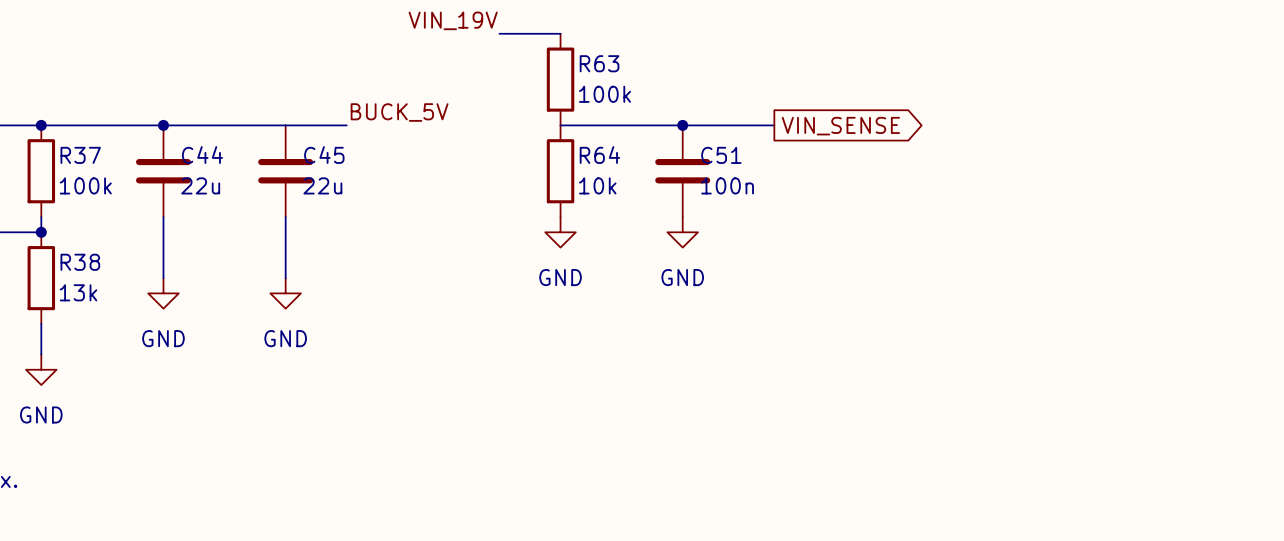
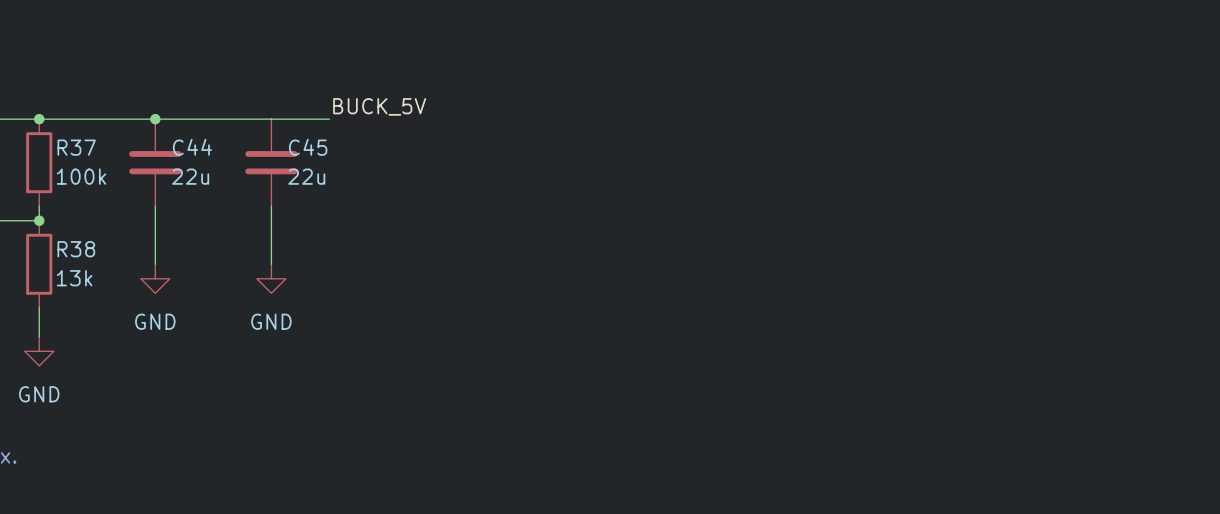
label: VIN_19V (453, 20) -> none
wire: (499, 33) (560, 33) -> none
R63: 100k (560, 79) -> none
wire: (560, 125) (774, 125) -> none
junction: (682, 125) -> none
global label: VIN_SENSE (840, 126) -> none
R64: 10k (560, 171) -> none
C51: 100n (682, 171) -> none
power symbol: GND (560, 232) -> none
power symbol: GND (682, 232) -> none

